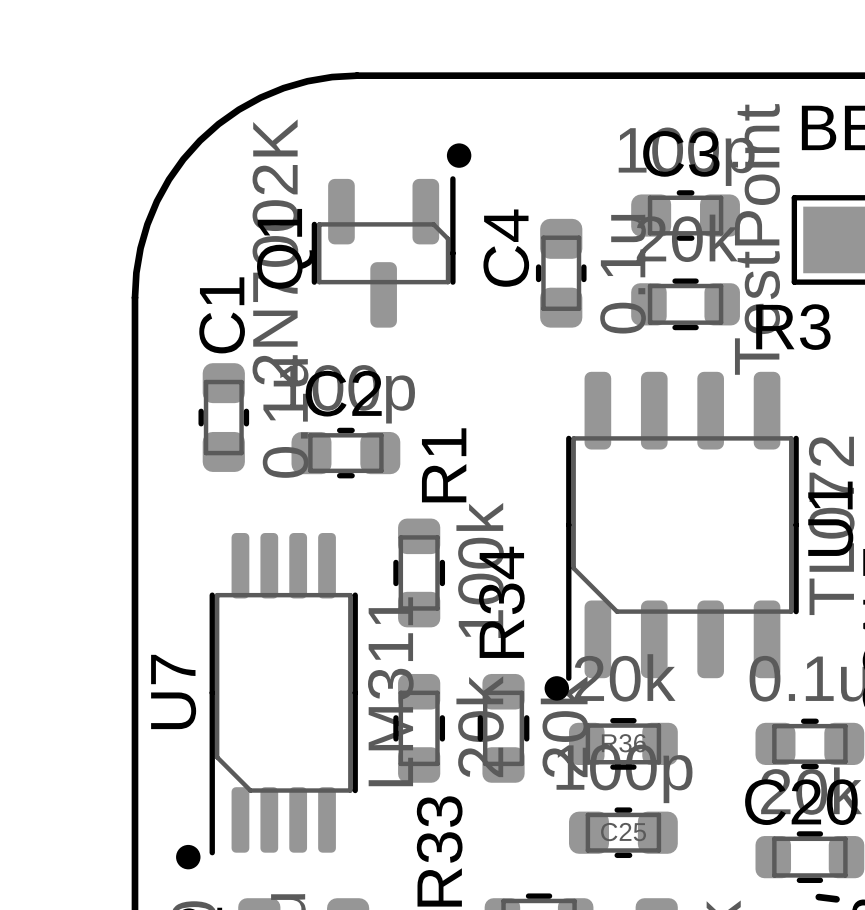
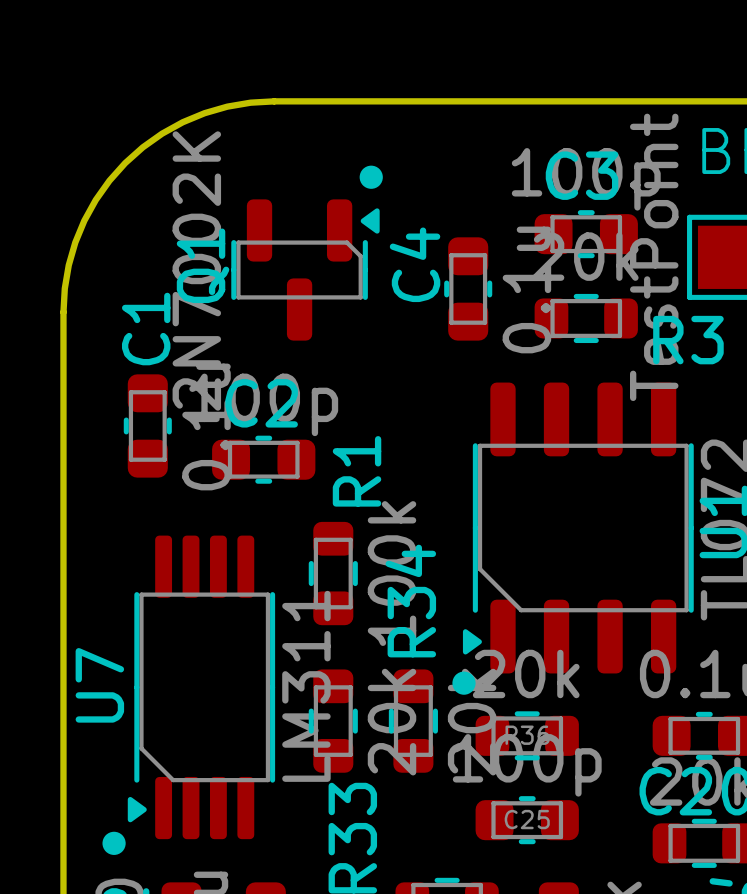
Q1 footprint: [311, 176, 456, 328] -> [231, 199, 380, 341]
U1 footprint: [566, 371, 799, 681] -> [462, 382, 694, 674]
U7 footprint: [209, 533, 358, 856] -> [127, 535, 276, 840]

